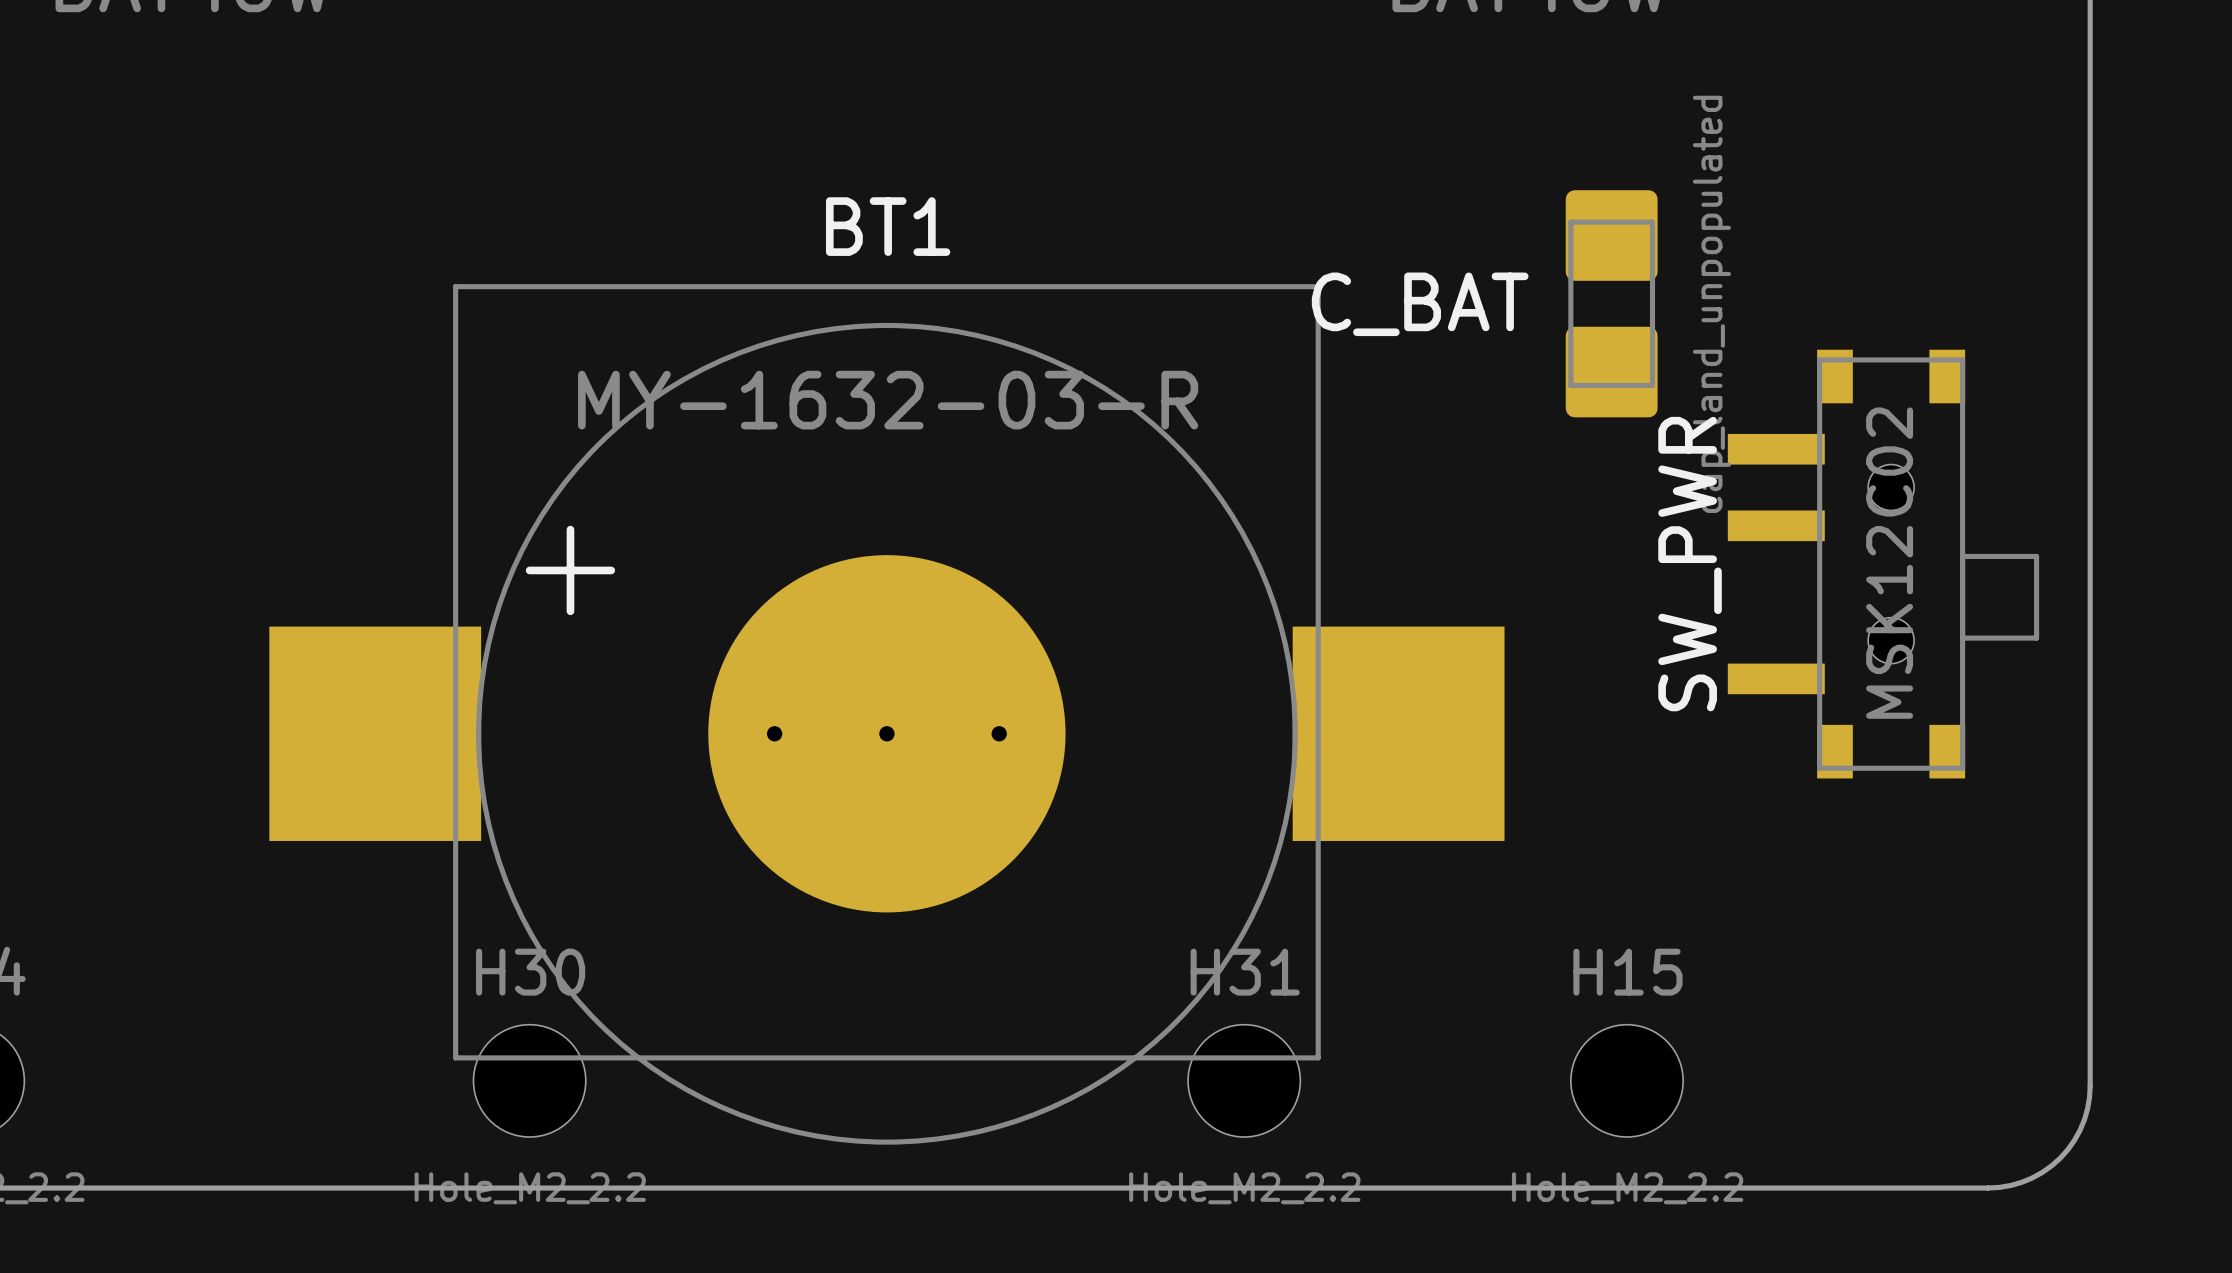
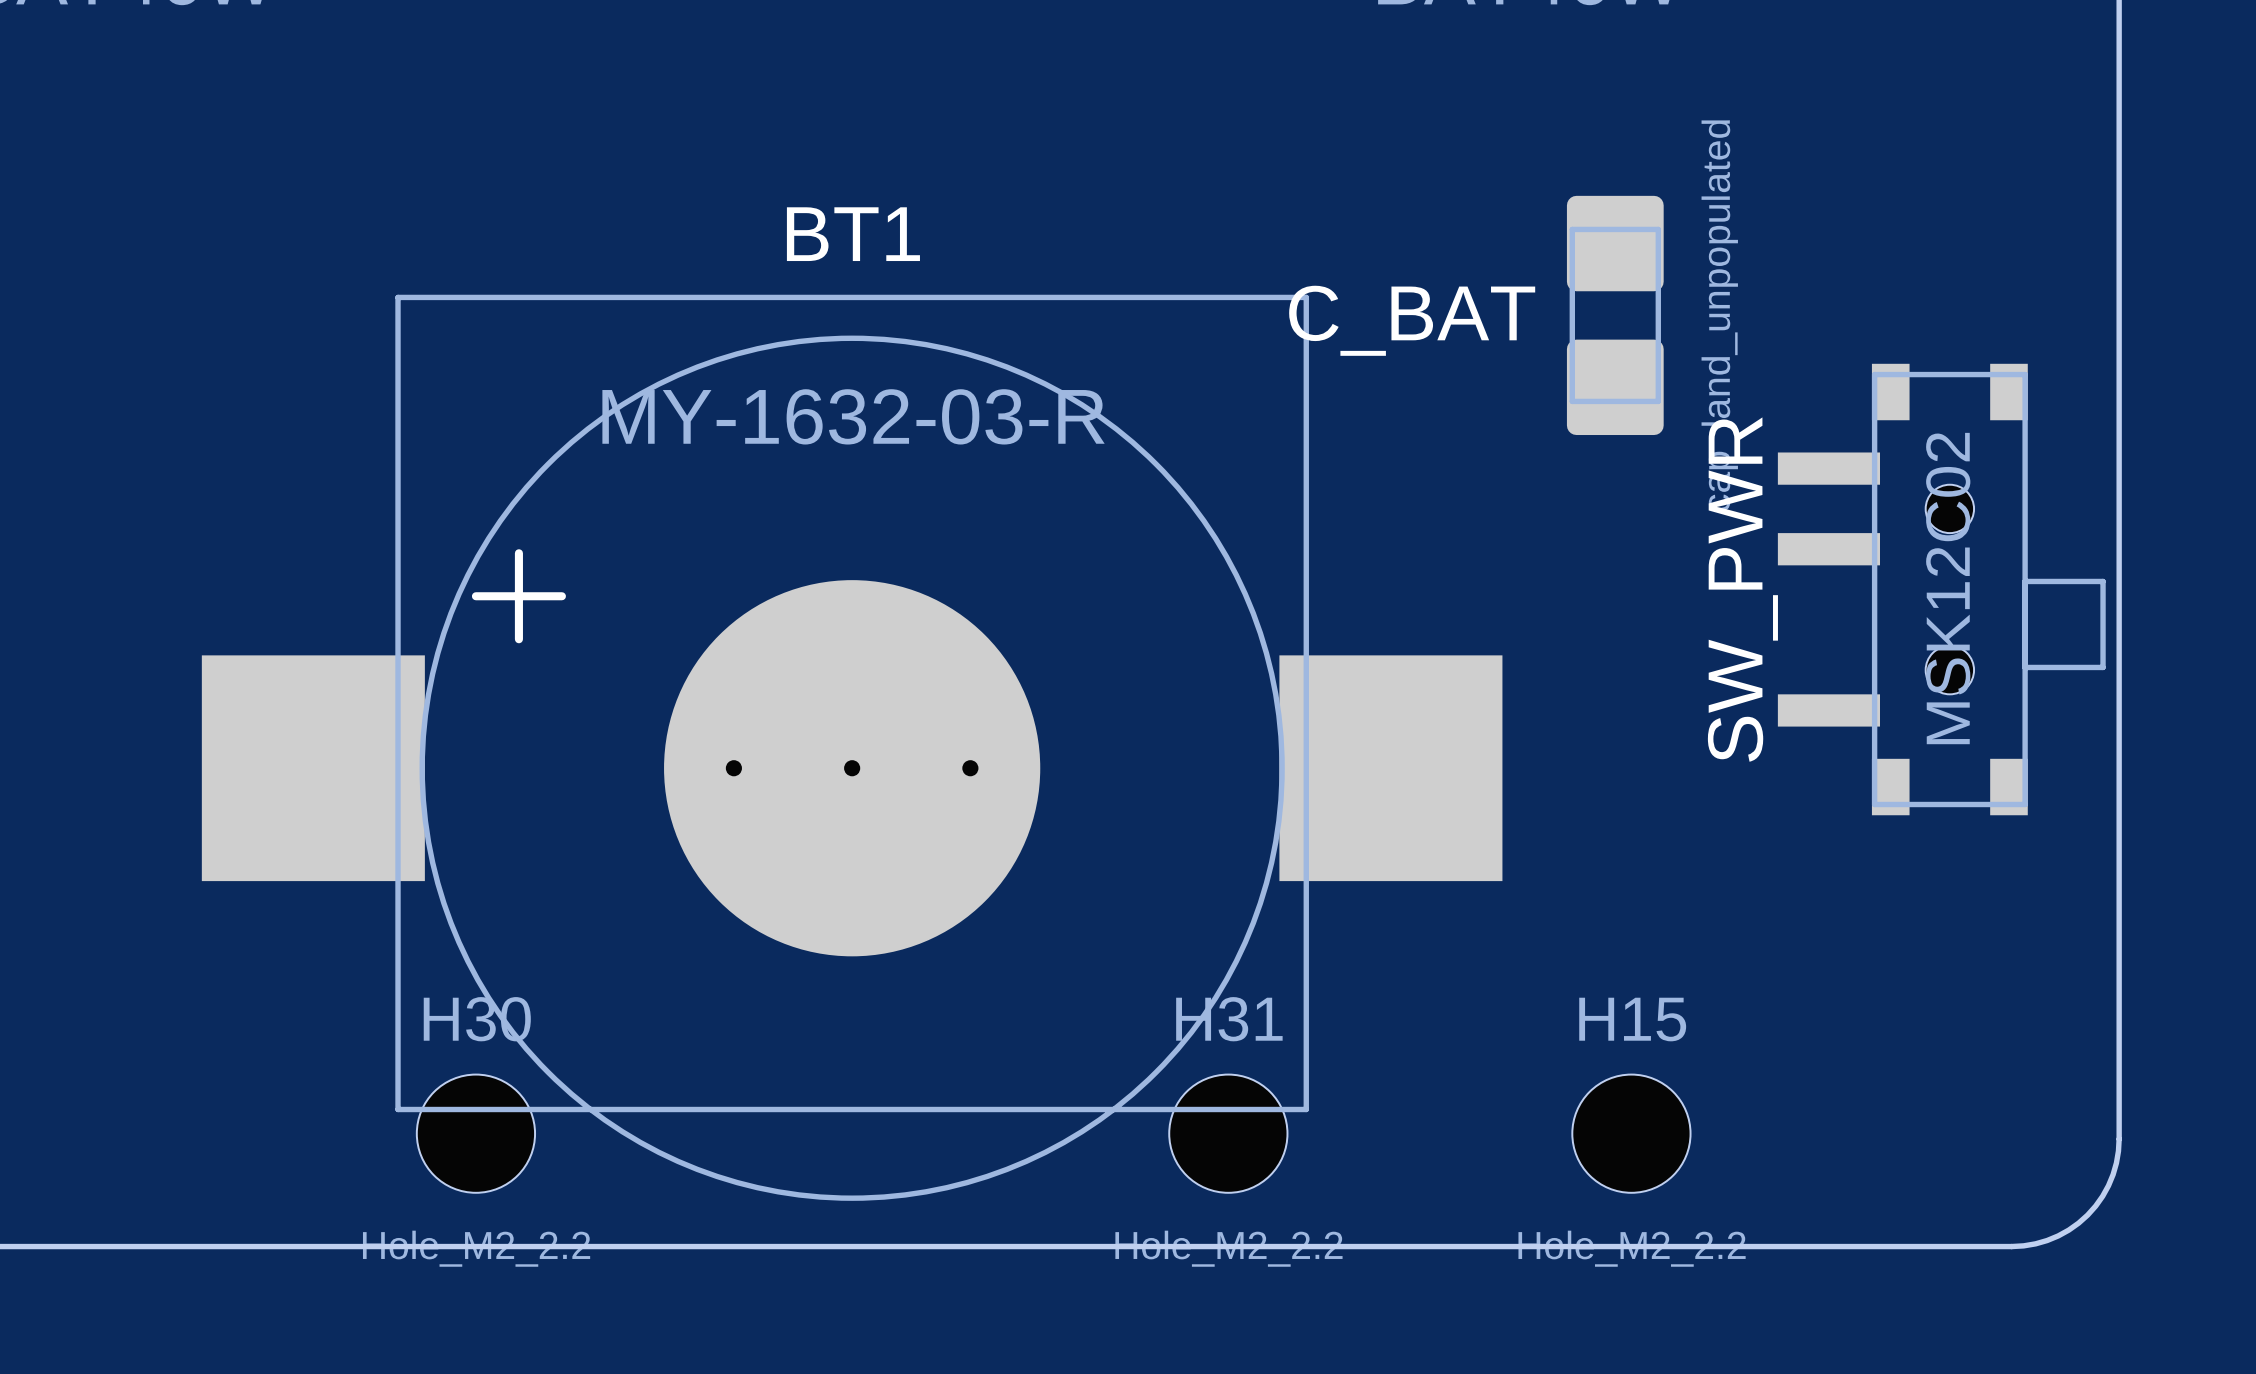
SW_PWR position: (1883, 564) -> (1941, 589)

